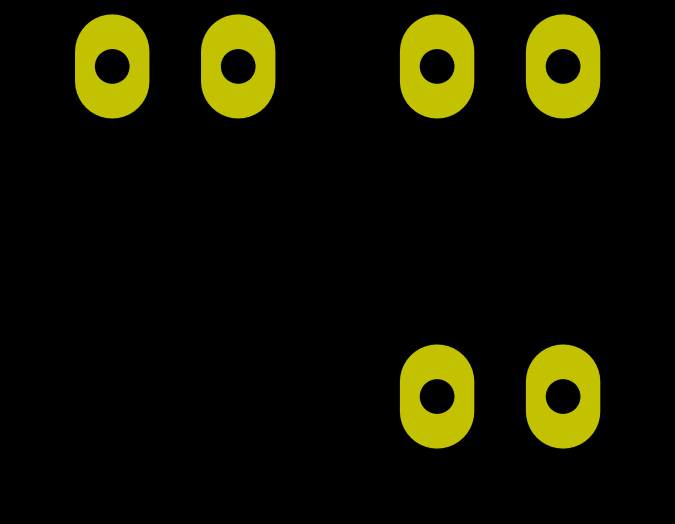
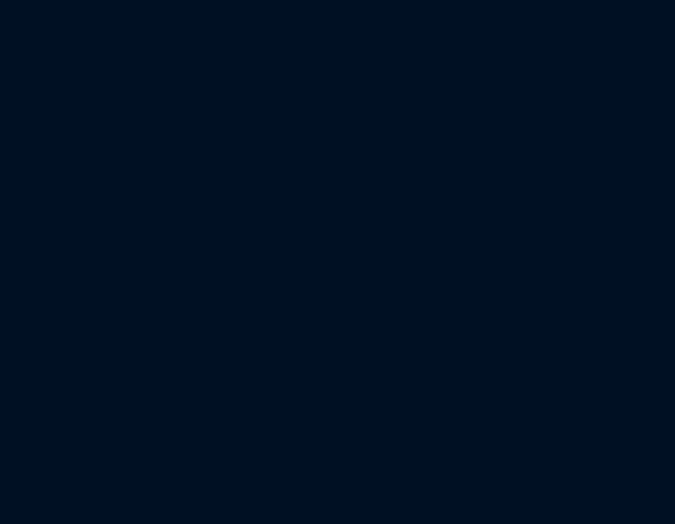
part: (175, 66) -> none
part: (500, 66) -> none
part: (500, 396) -> none

